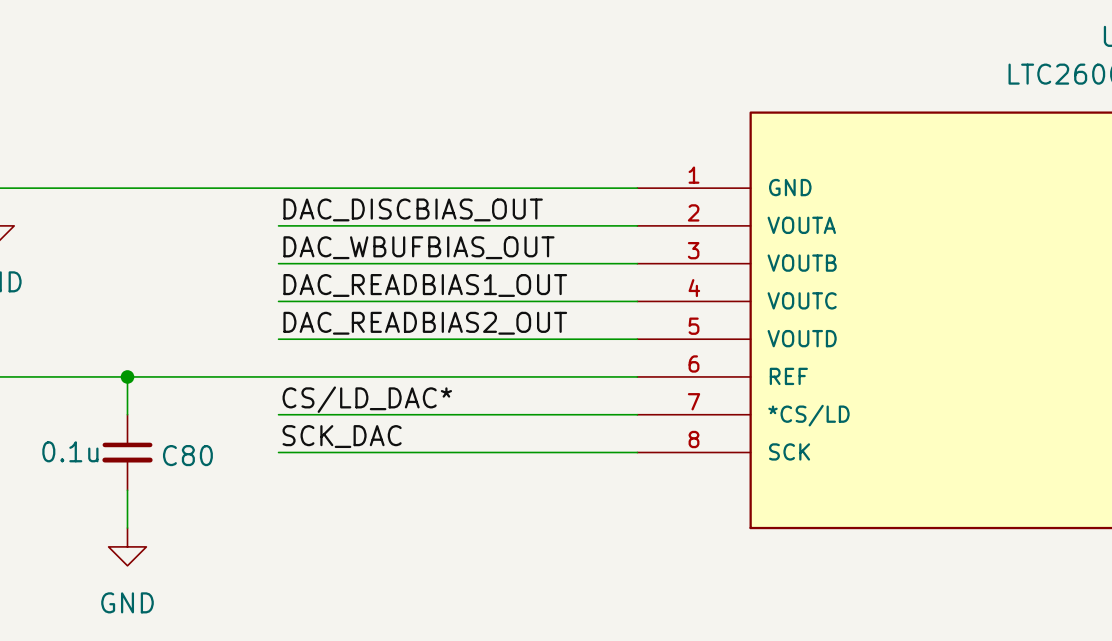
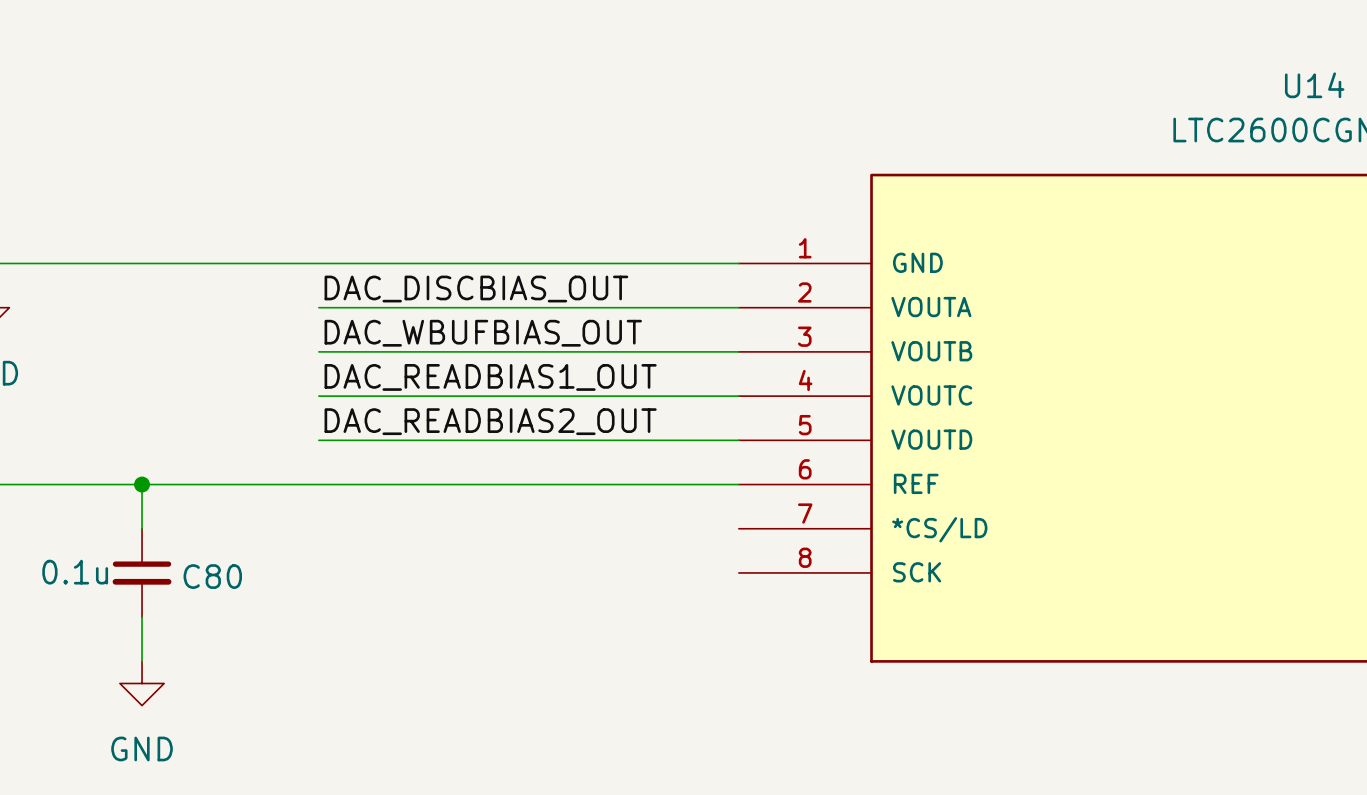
label: CS/LD_DAC* (367, 399) -> none
wire: (278, 414) (637, 414) -> none
label: SCK_DAC (342, 436) -> none
wire: (278, 452) (637, 452) -> none

